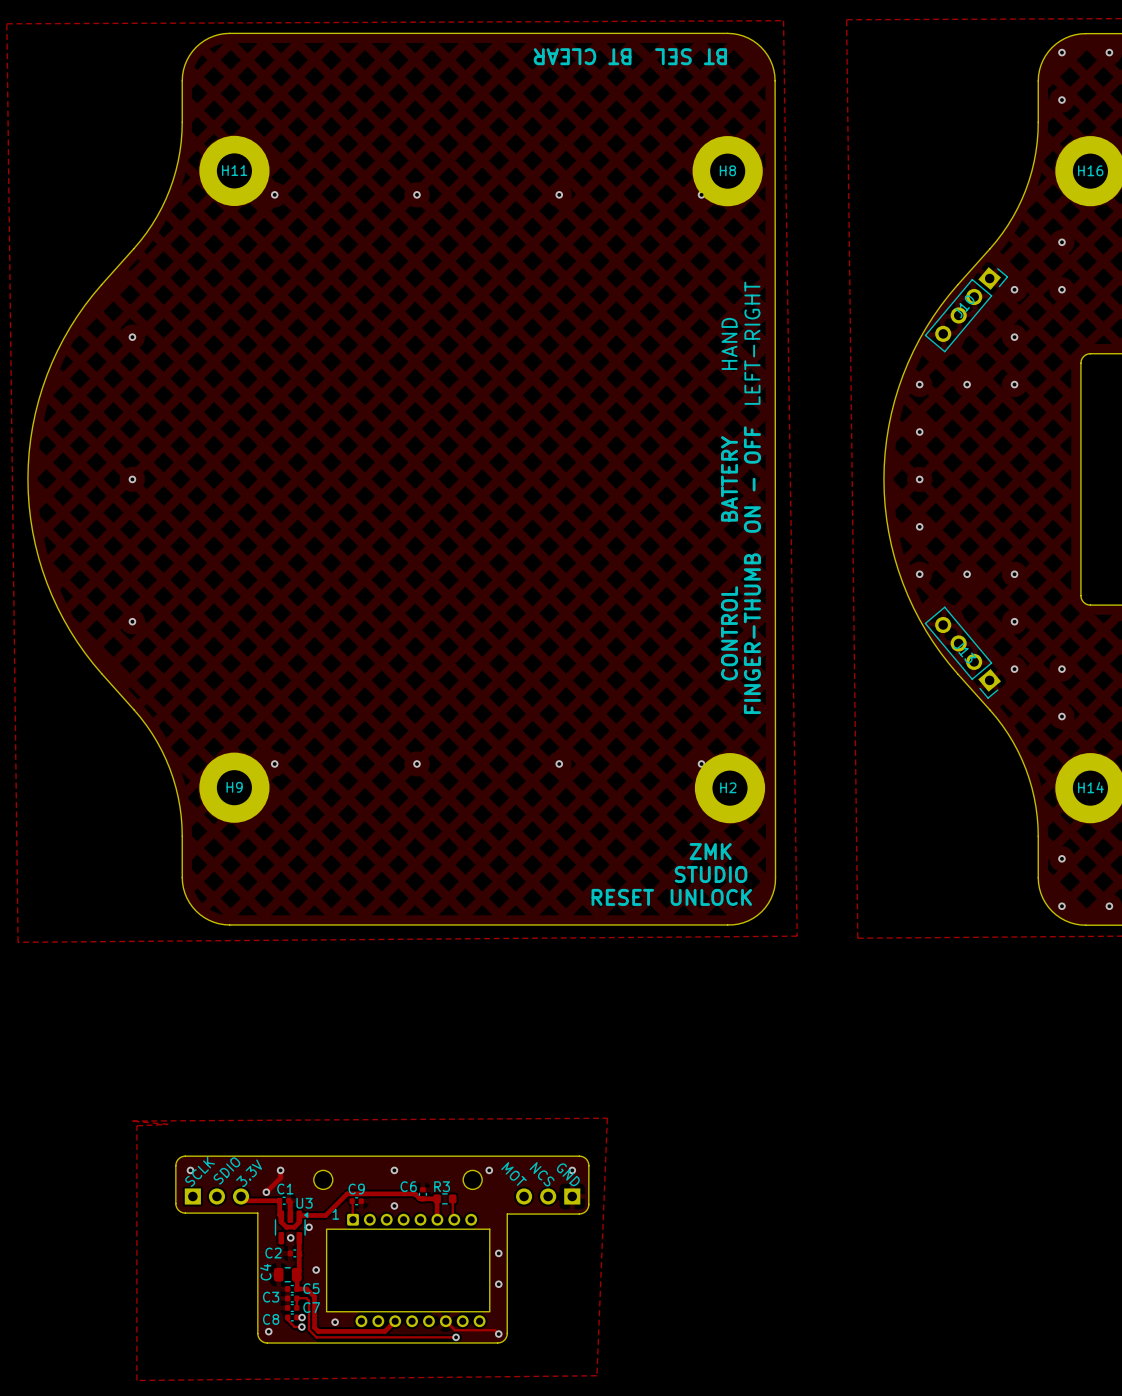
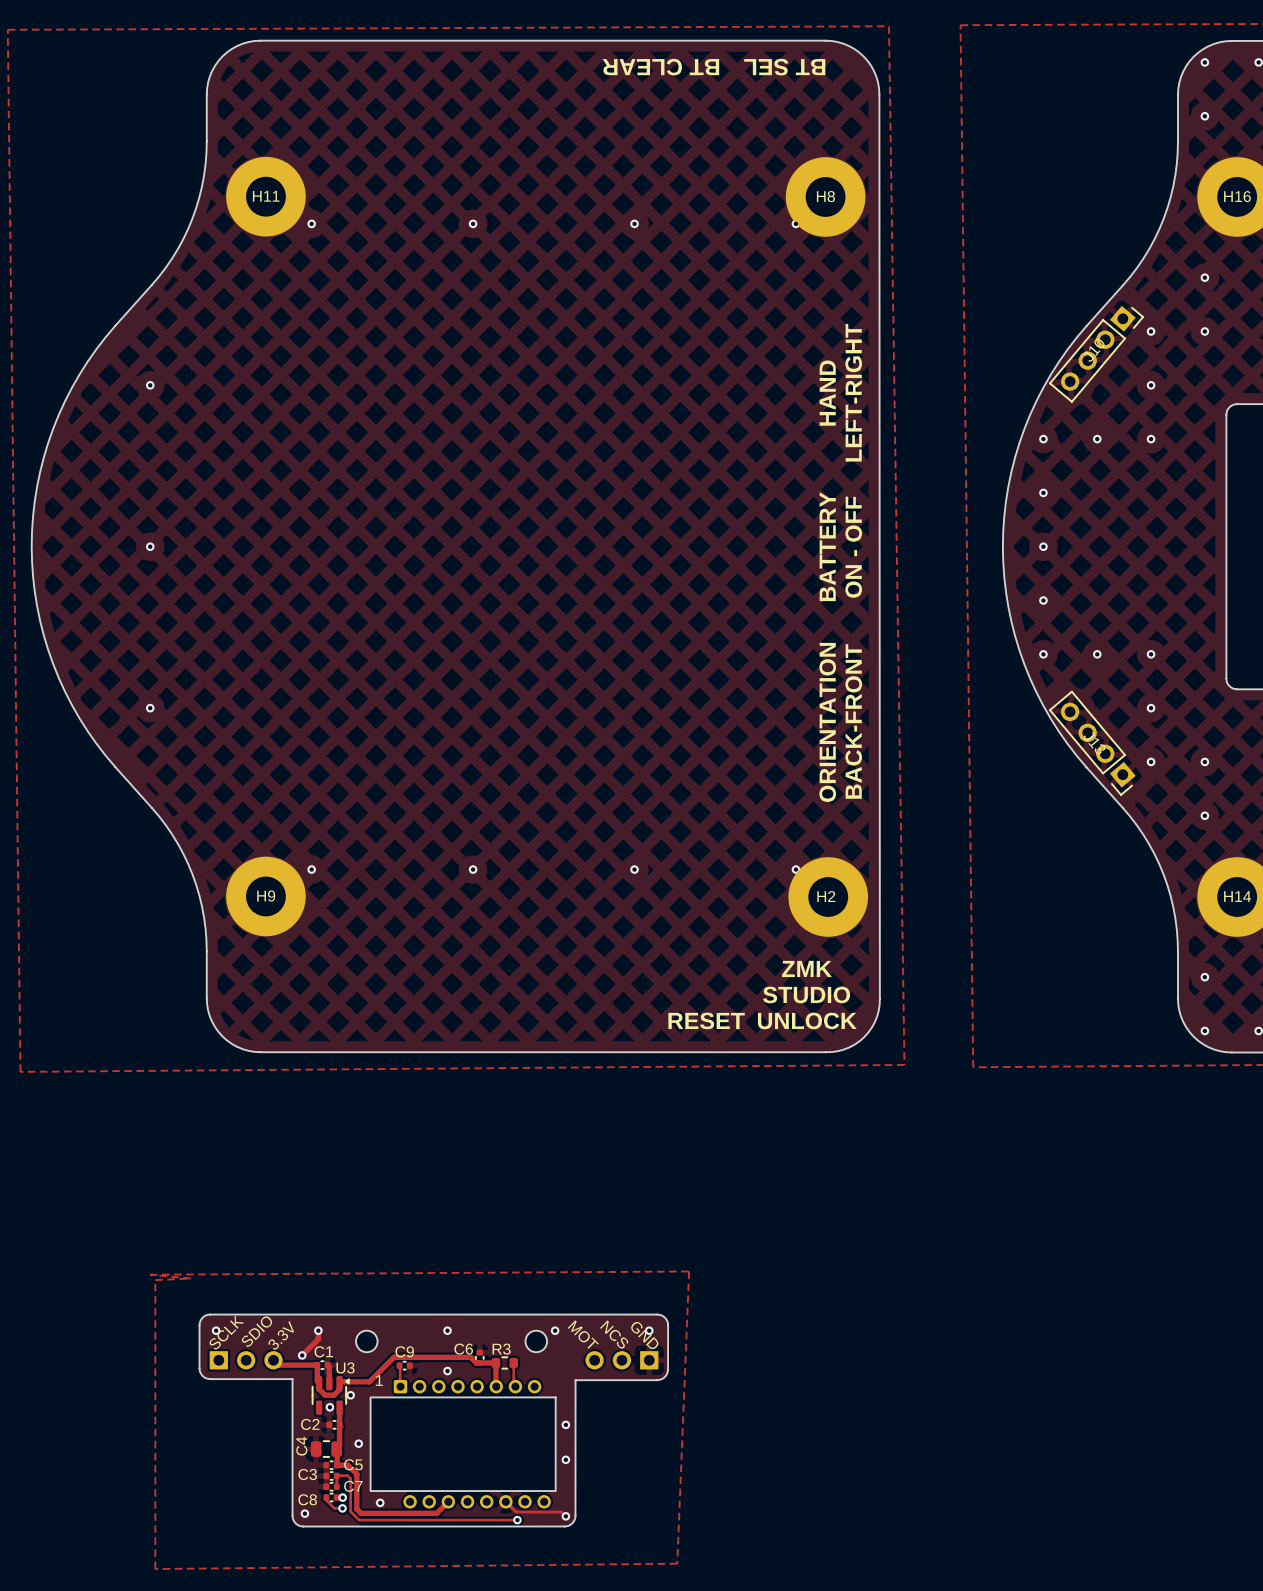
text: CONTROL (729, 633) -> ORIENTATION (827, 722)
text: FINGER-THUMB (752, 633) -> BACK-FRONT (853, 721)

